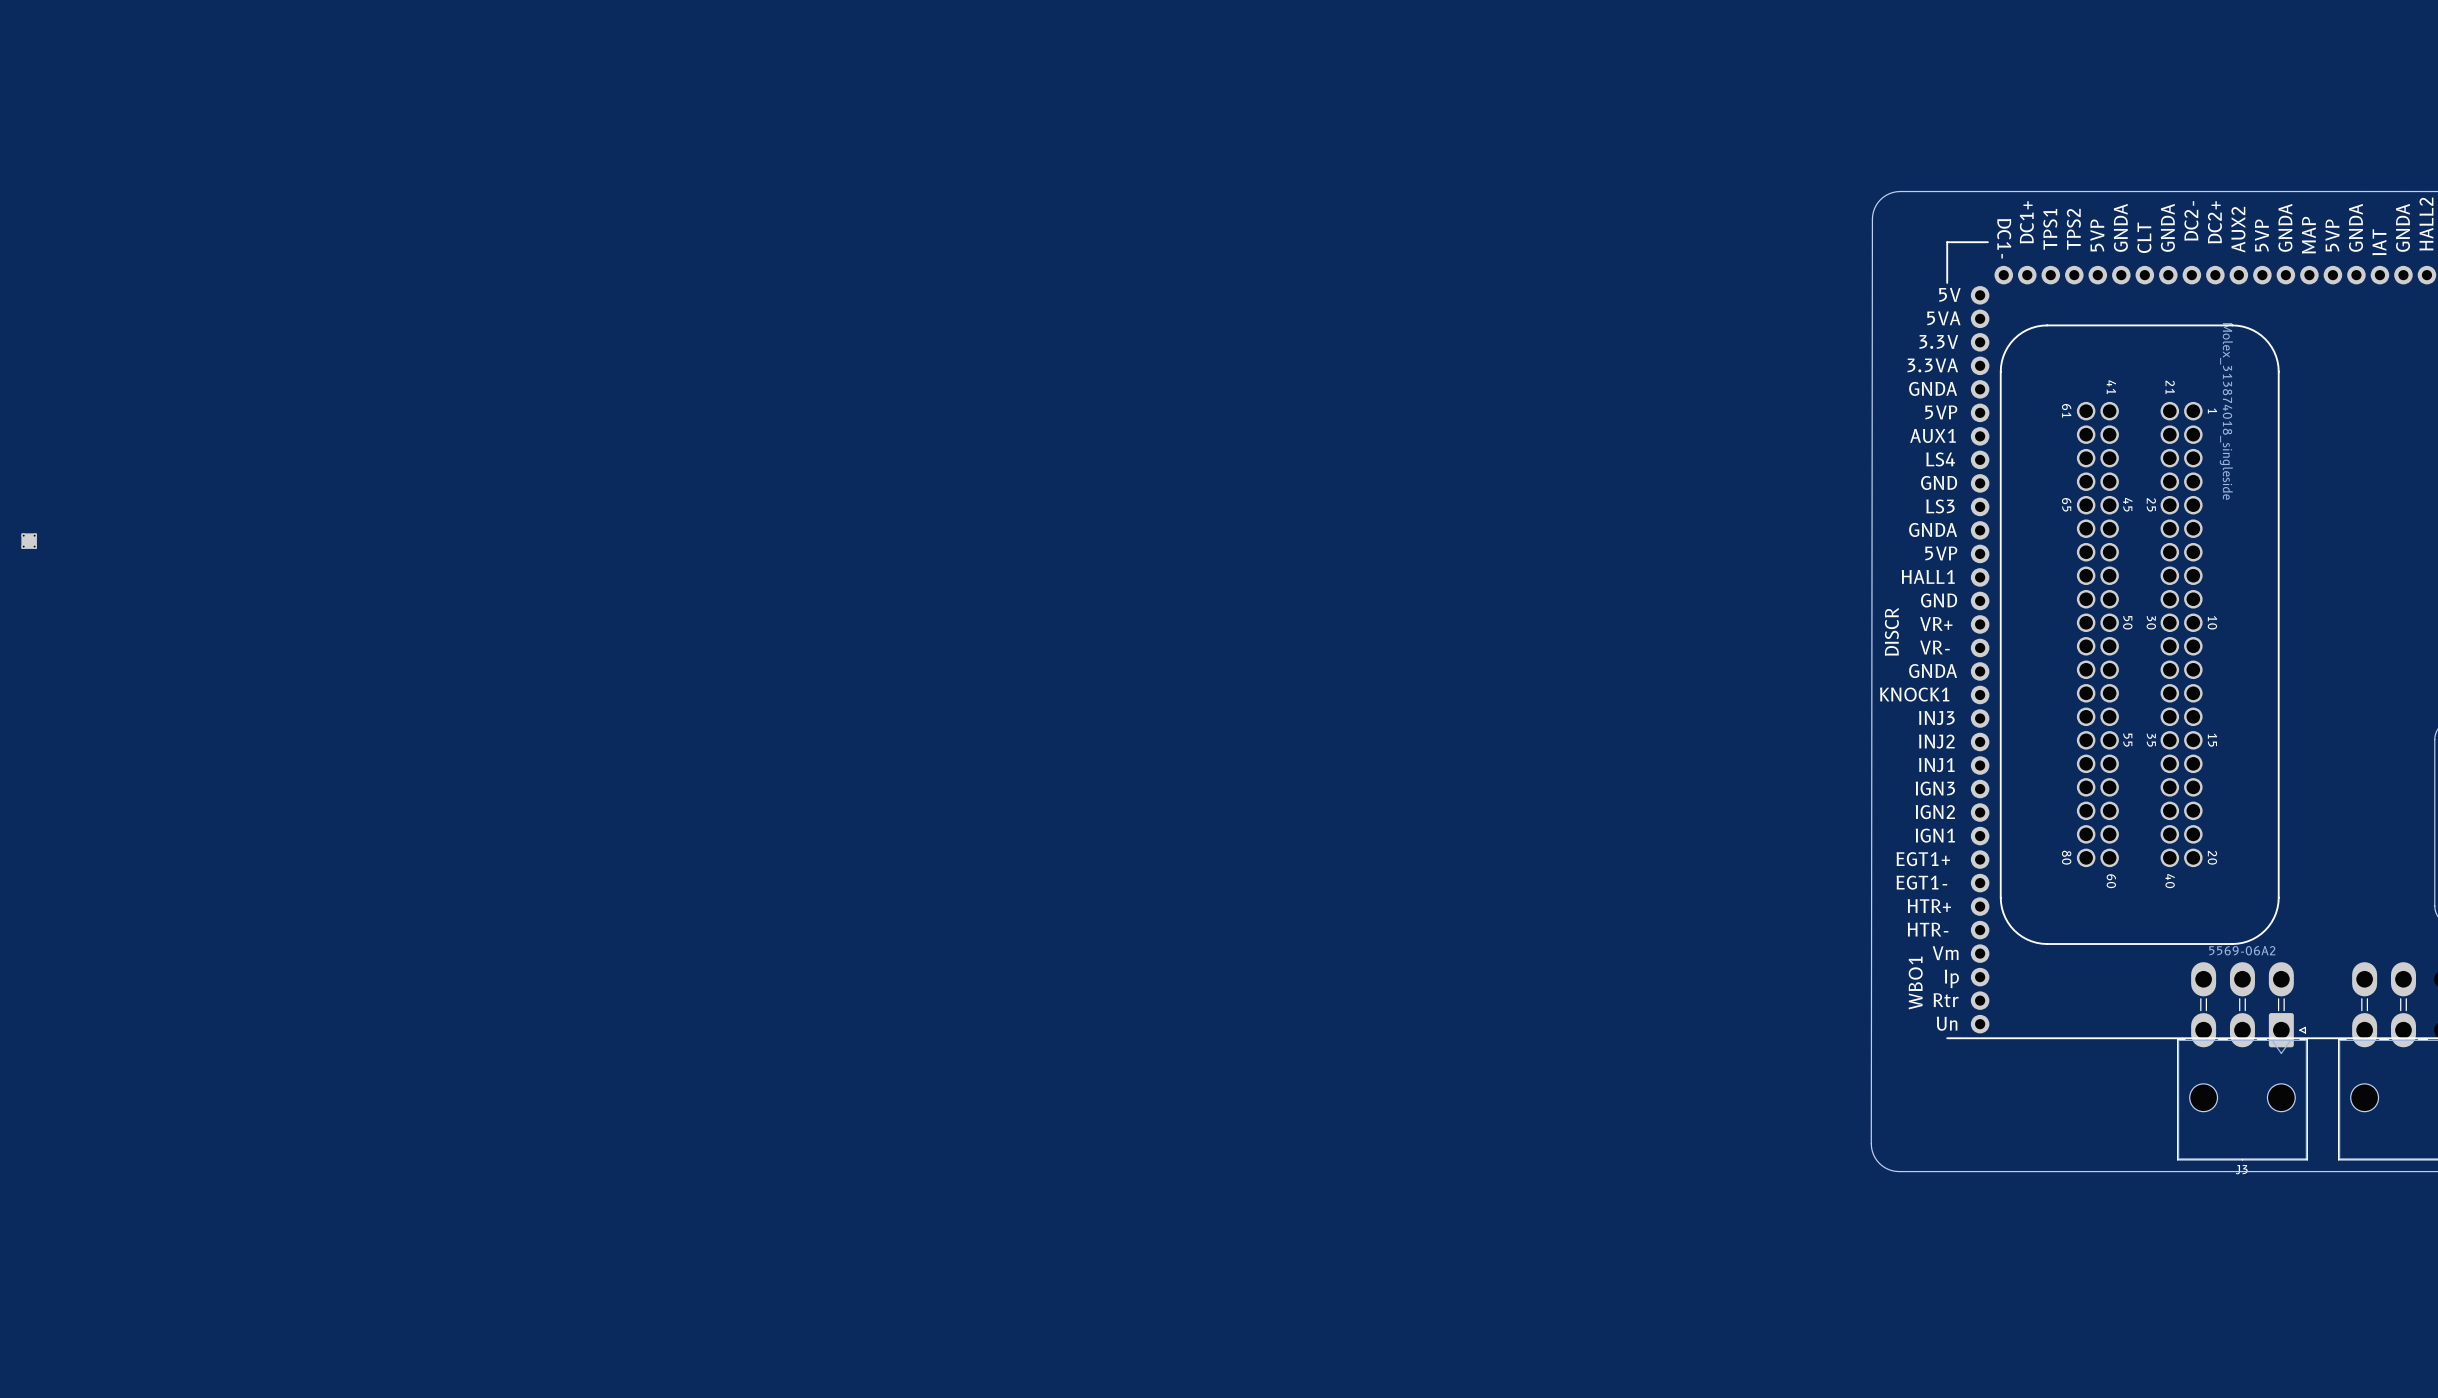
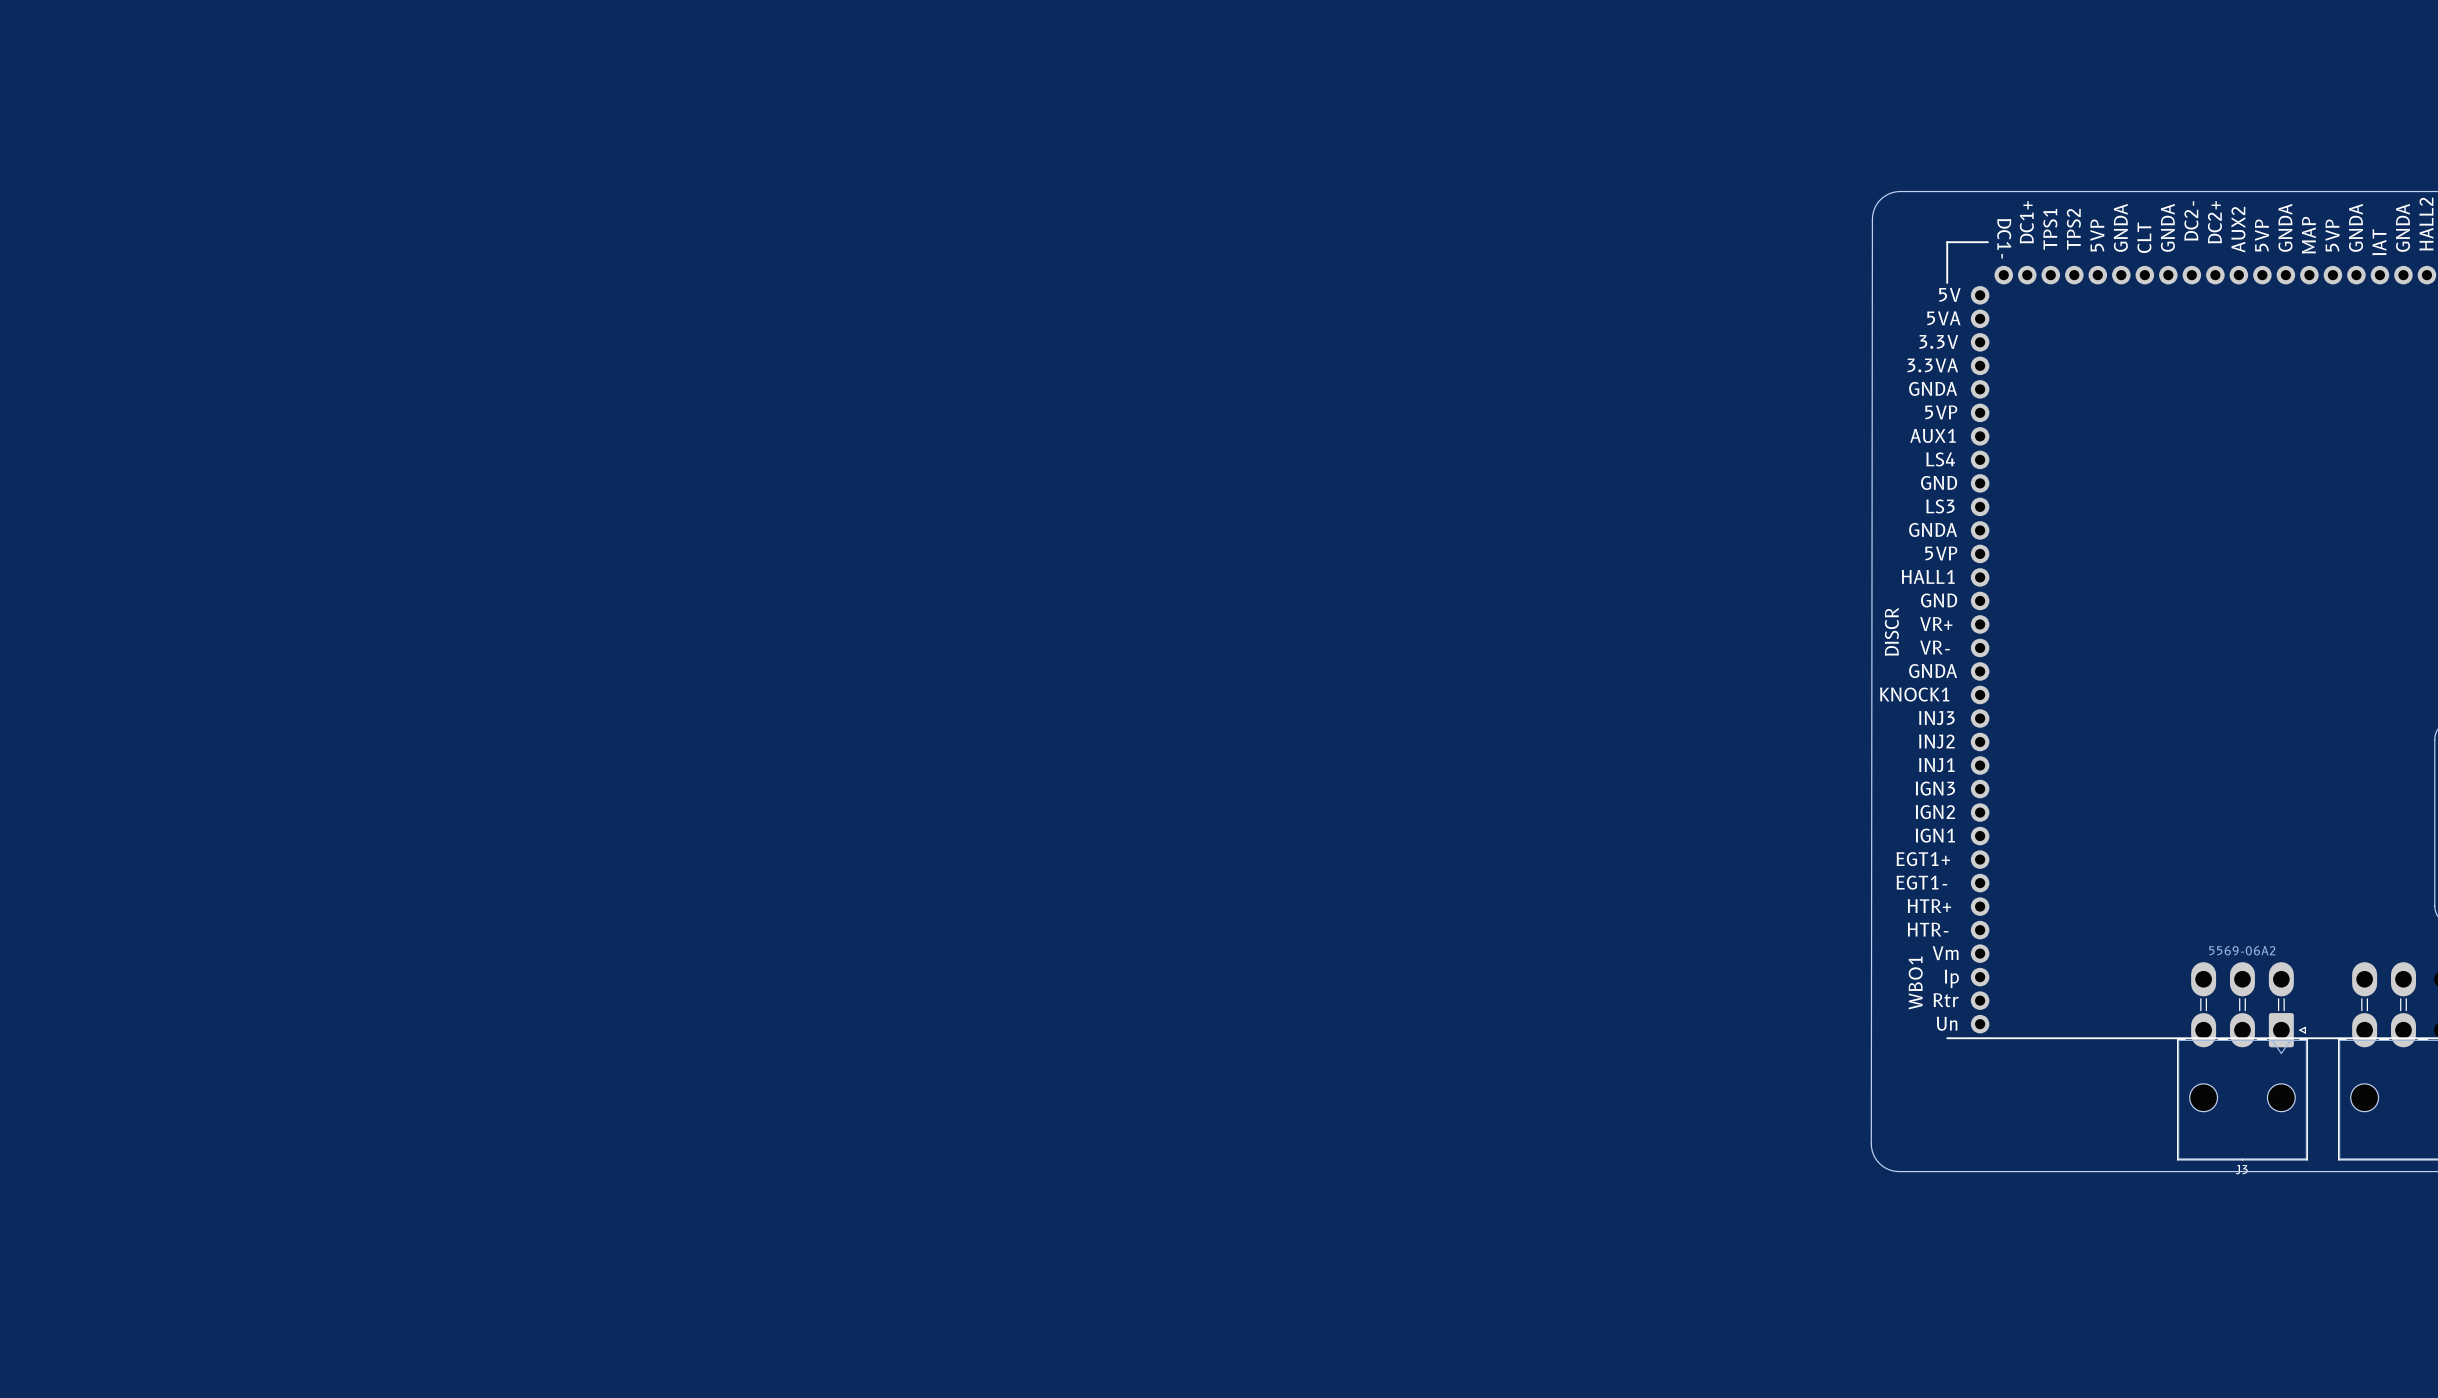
part: (29, 541) -> none
part: Molex_313874018_singleside (2139, 634) -> none

